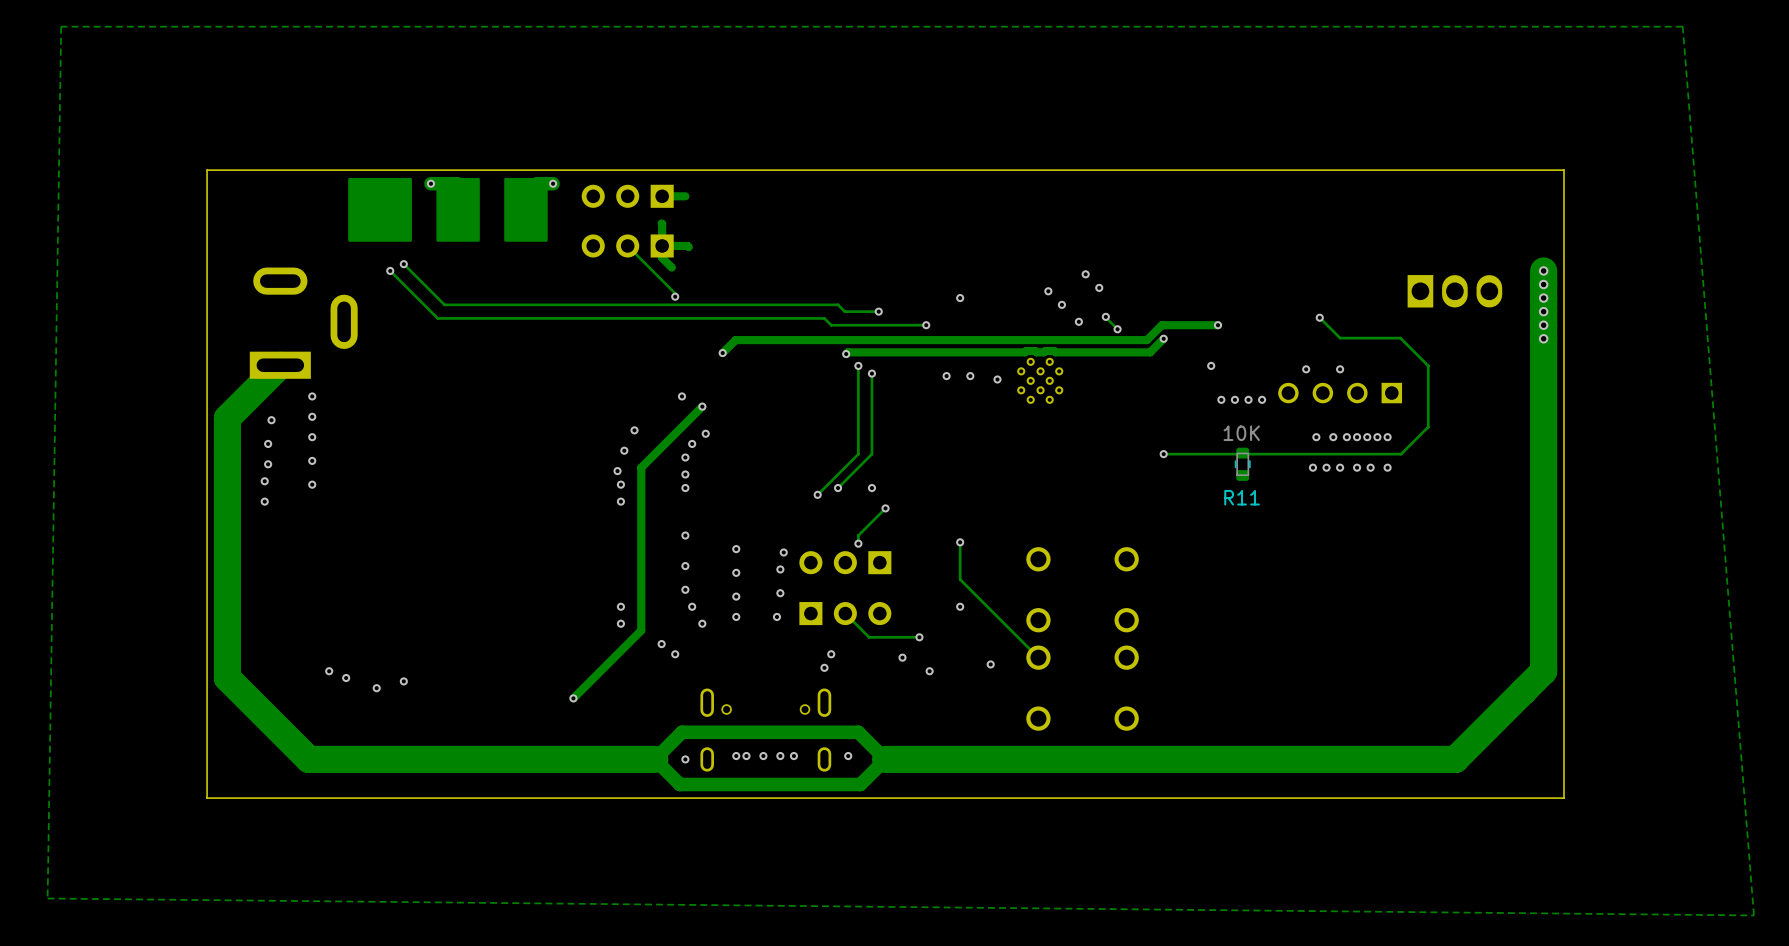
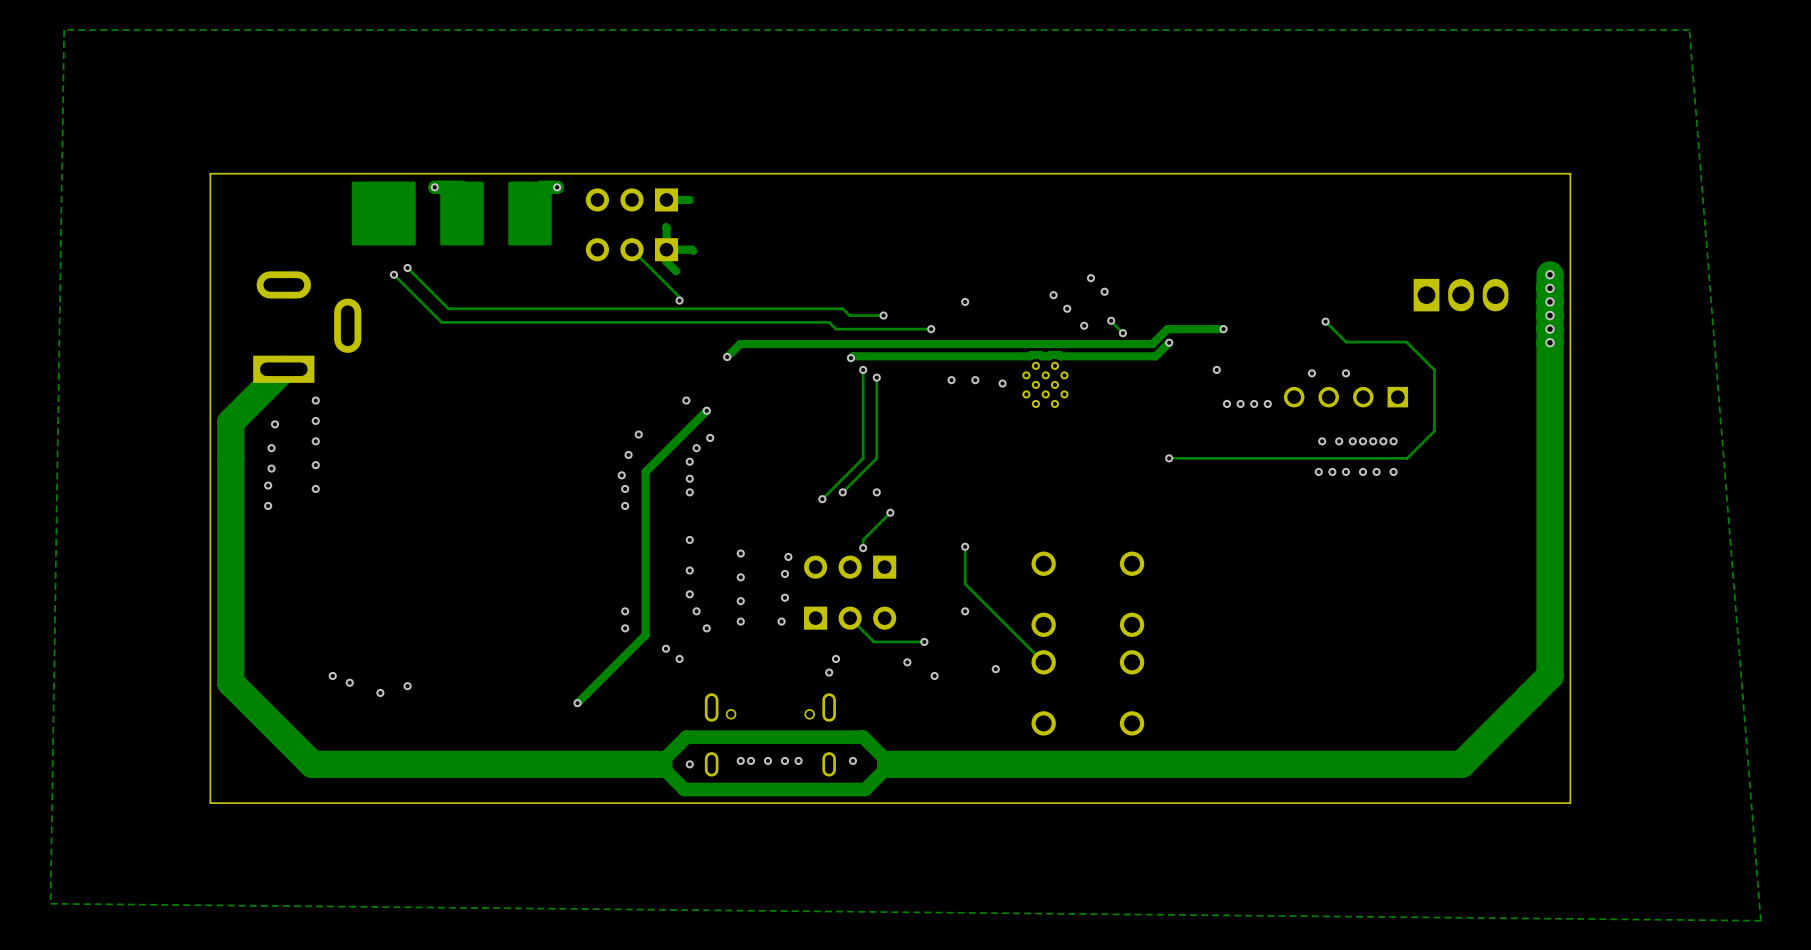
R11: 10K (1242, 464) -> none

